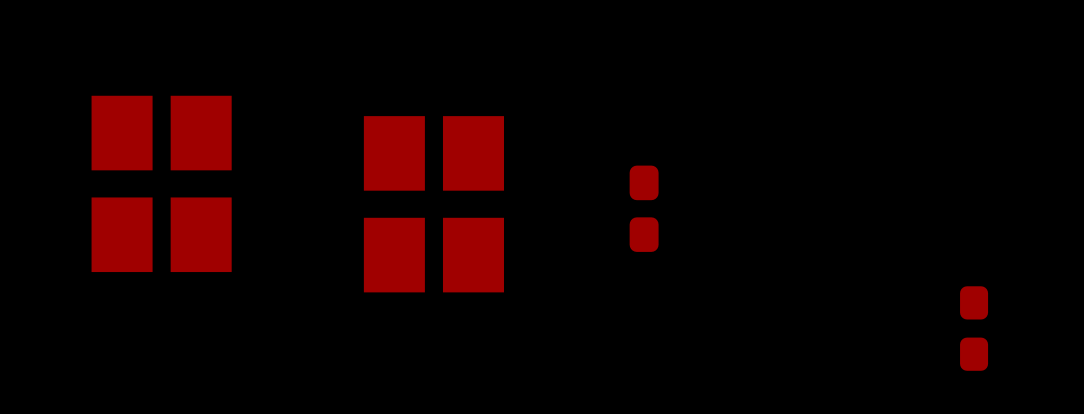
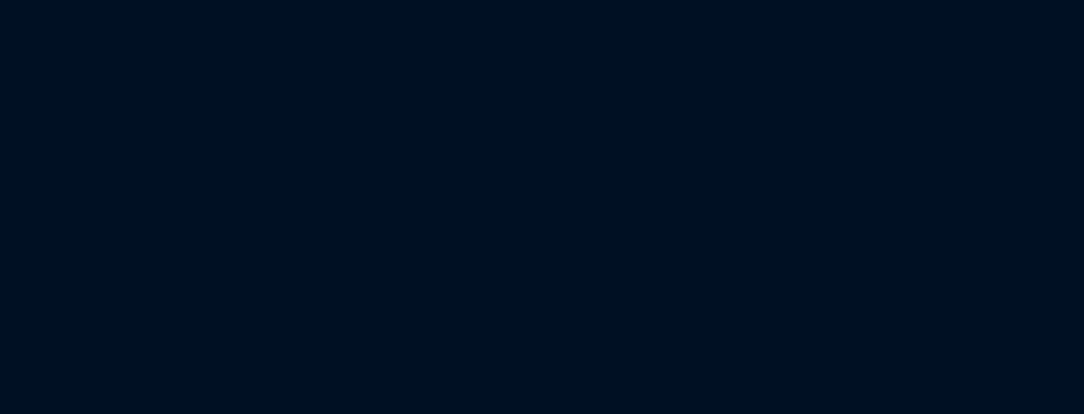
part: (161, 183) -> none
part: (433, 204) -> none
part: (644, 208) -> none
part: (974, 328) -> none

